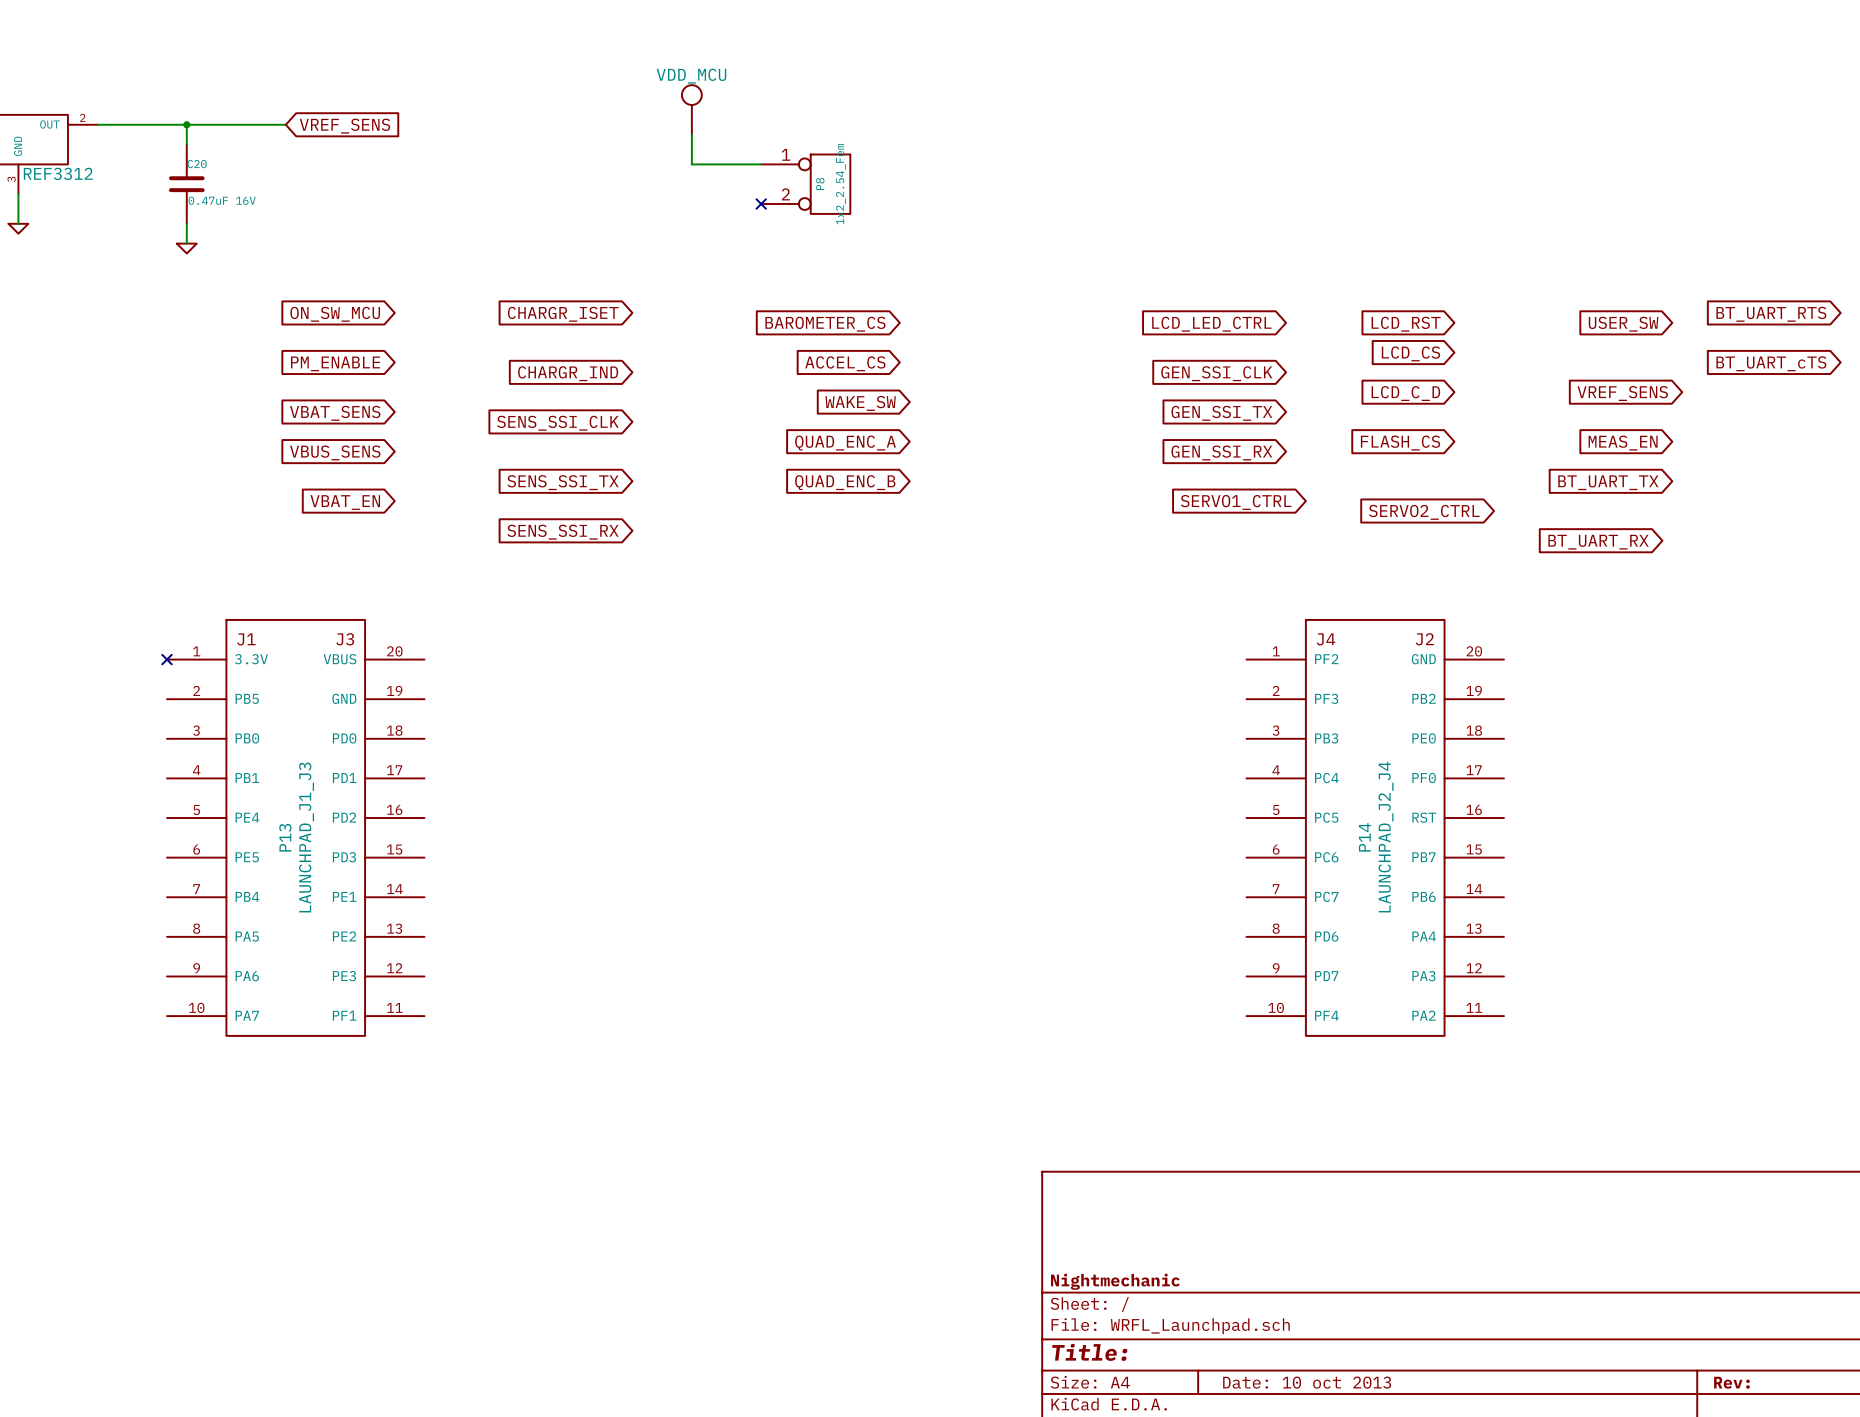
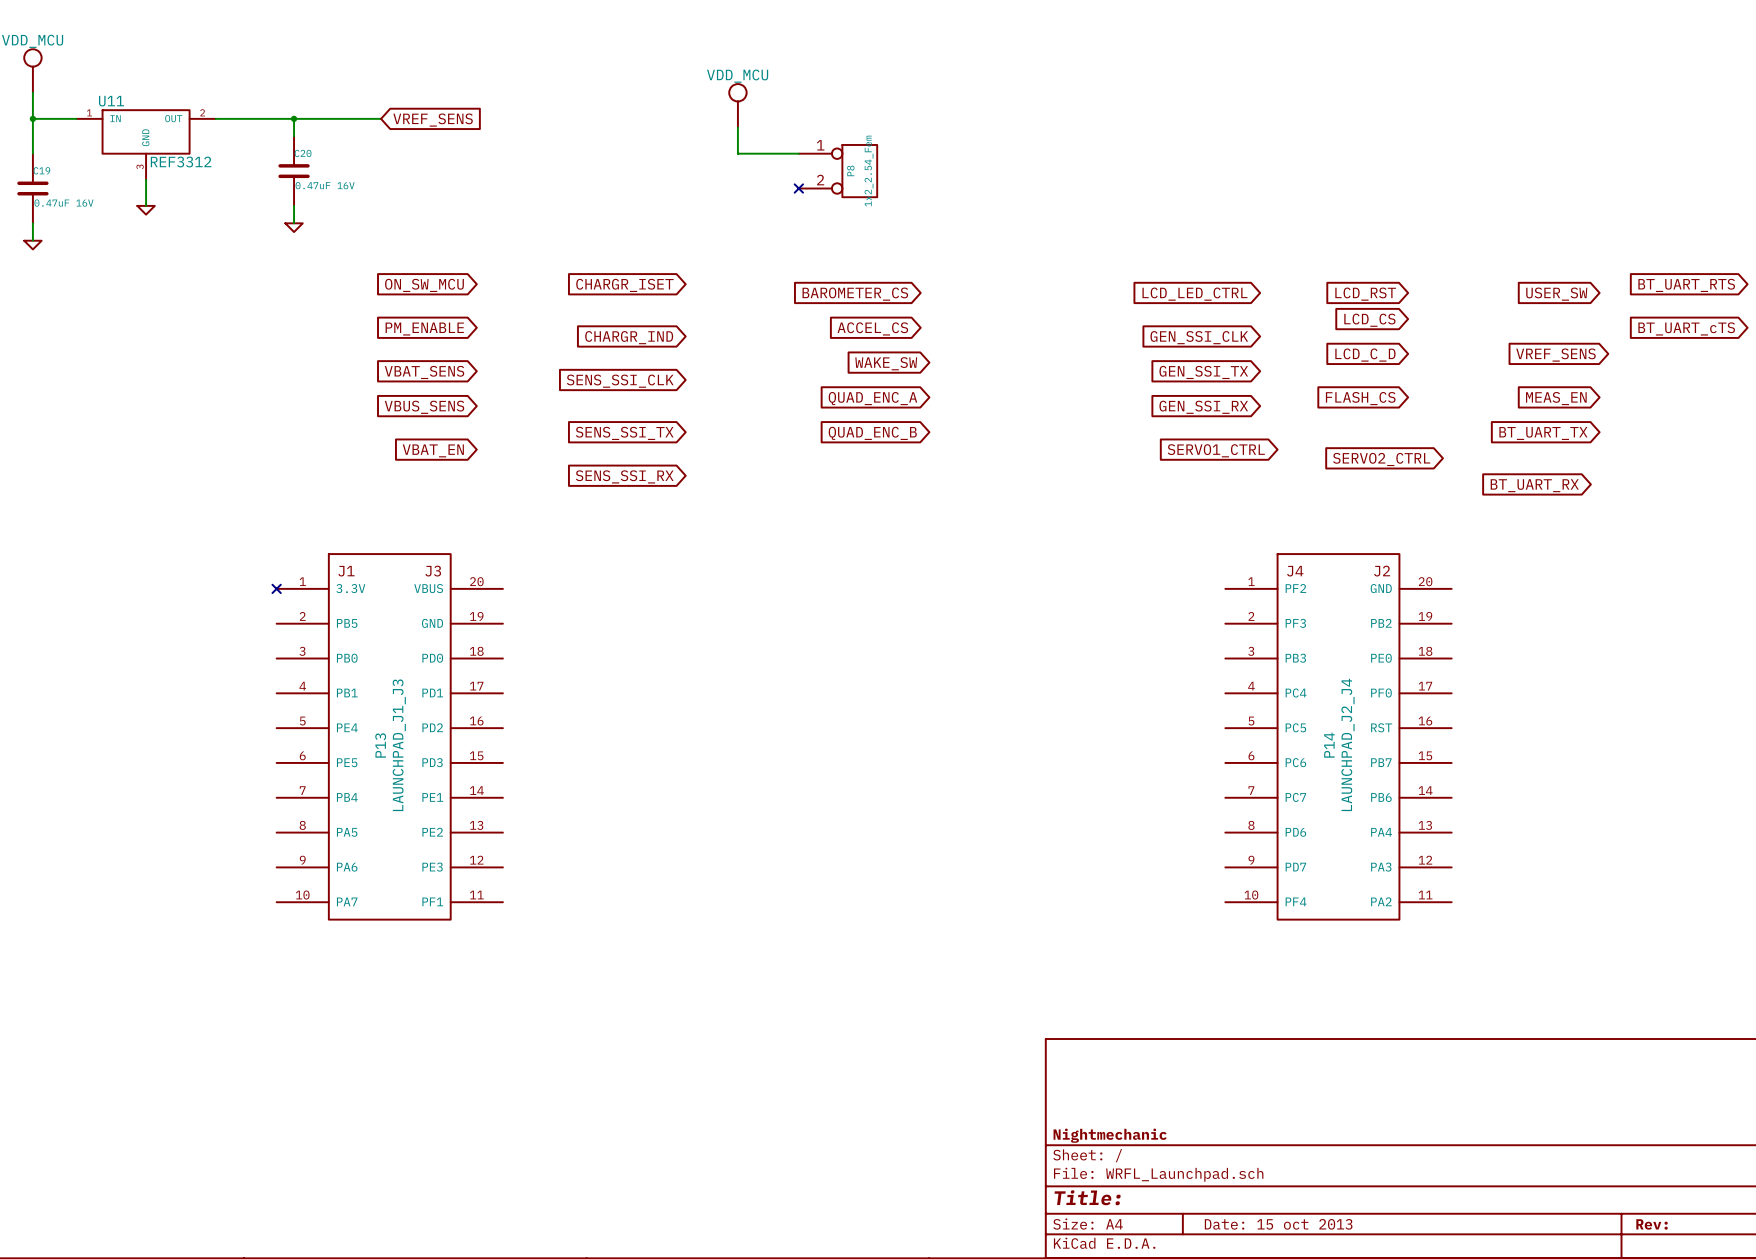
title block: Date: 10 oct 2013 (1307, 1382) -> Date: 15 oct 2013 (1278, 1224)

